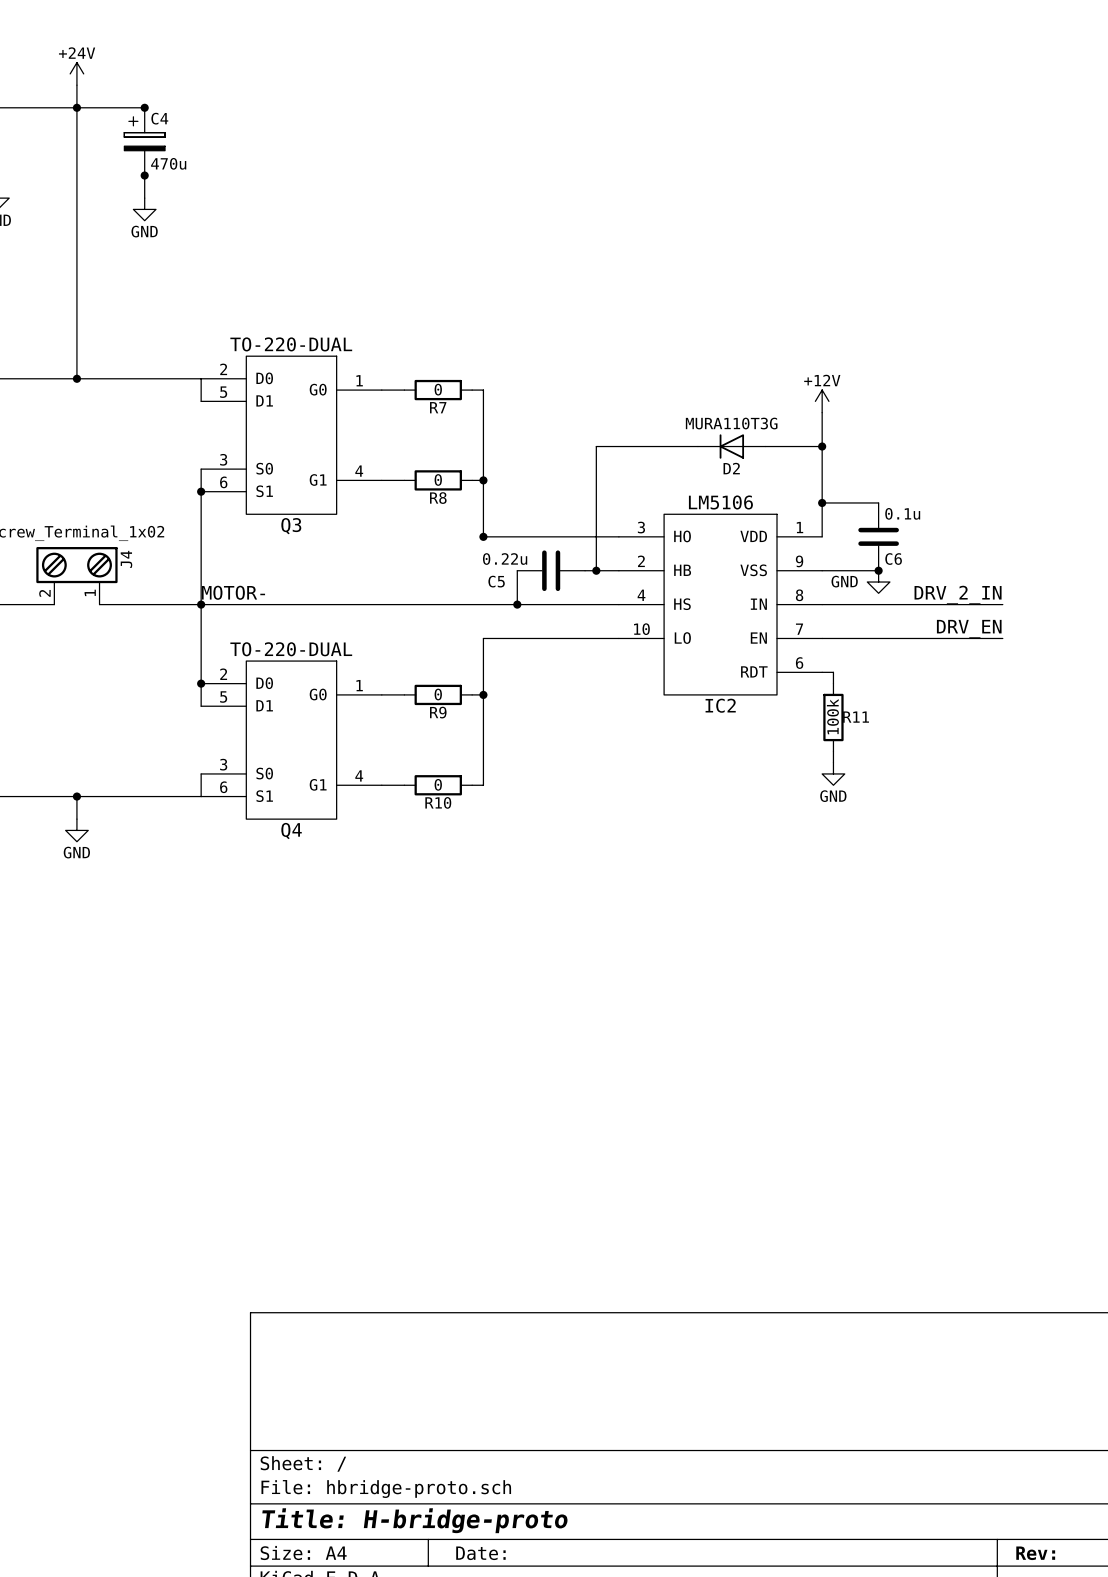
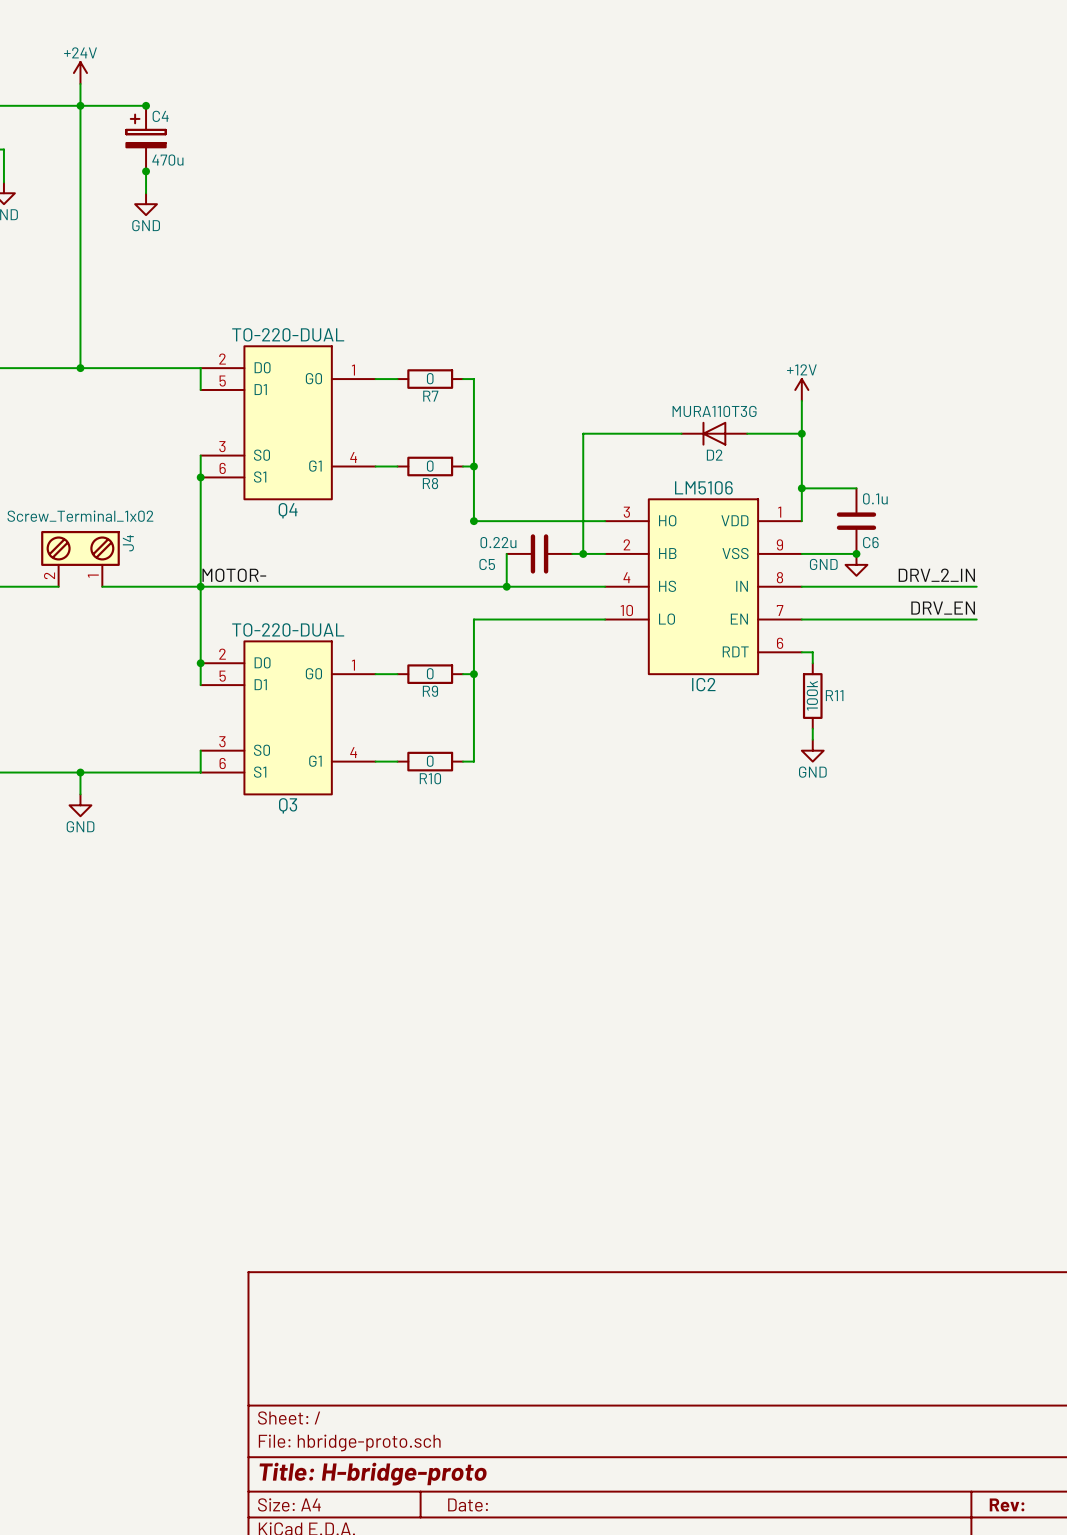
Q3 name: Q3 (291, 526) -> Q4 (288, 510)
Q4 name: Q4 (291, 831) -> Q3 (288, 805)

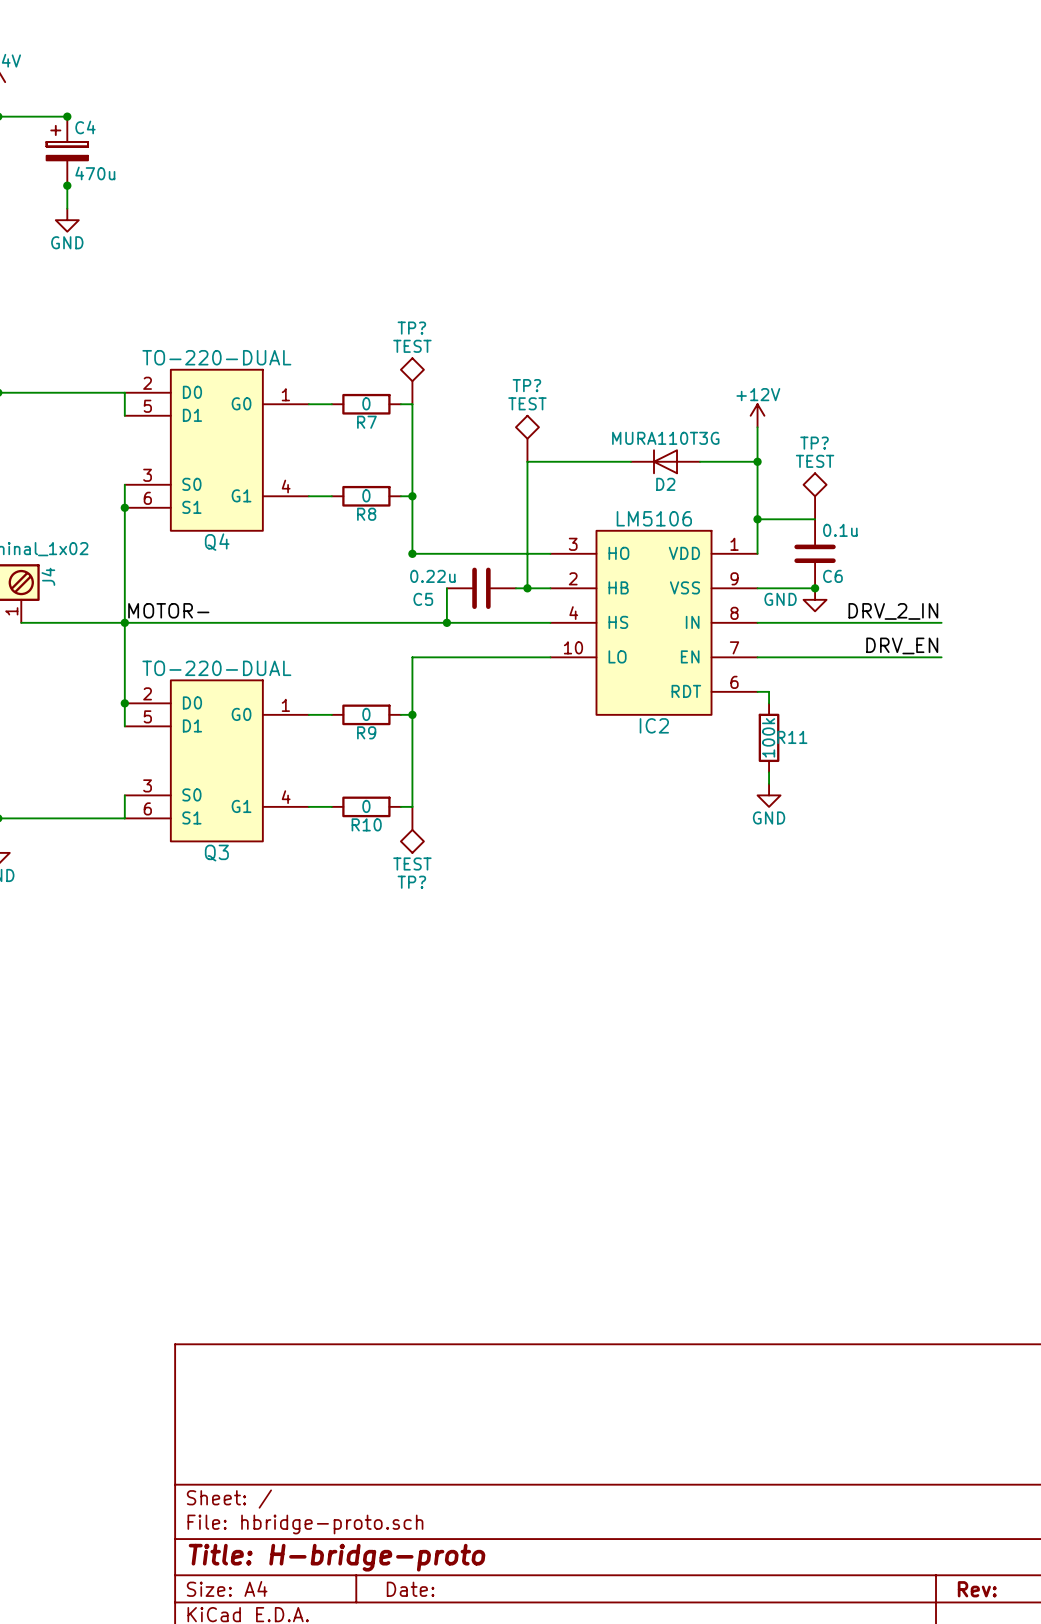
TP?: none -> TEST (412, 381)
TP?: none -> TEST (527, 438)
TP?: none -> TEST (815, 496)
TP?: none -> TEST (412, 829)

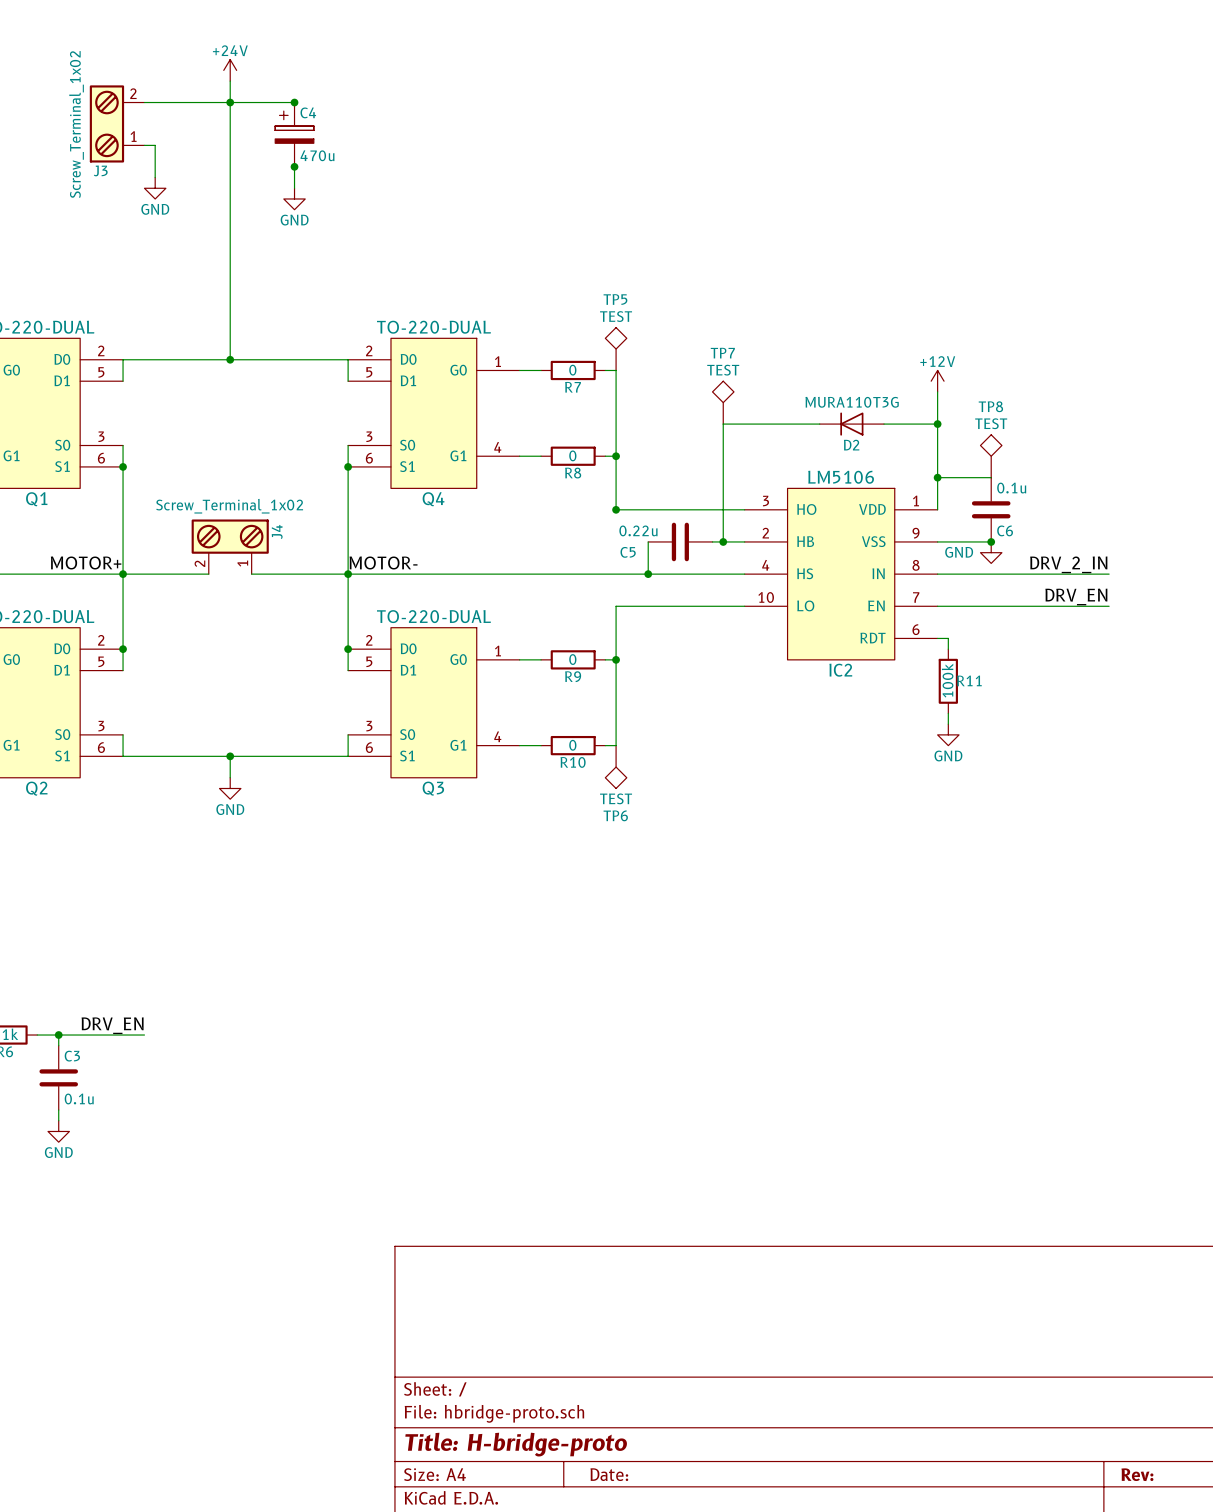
TP? name: TP? (411, 328) -> TP5 (615, 299)
TP? name: TP? (526, 385) -> TP7 (722, 353)
TP? name: TP? (814, 443) -> TP8 (990, 406)
TP? name: TP? (411, 882) -> TP6 (615, 815)

